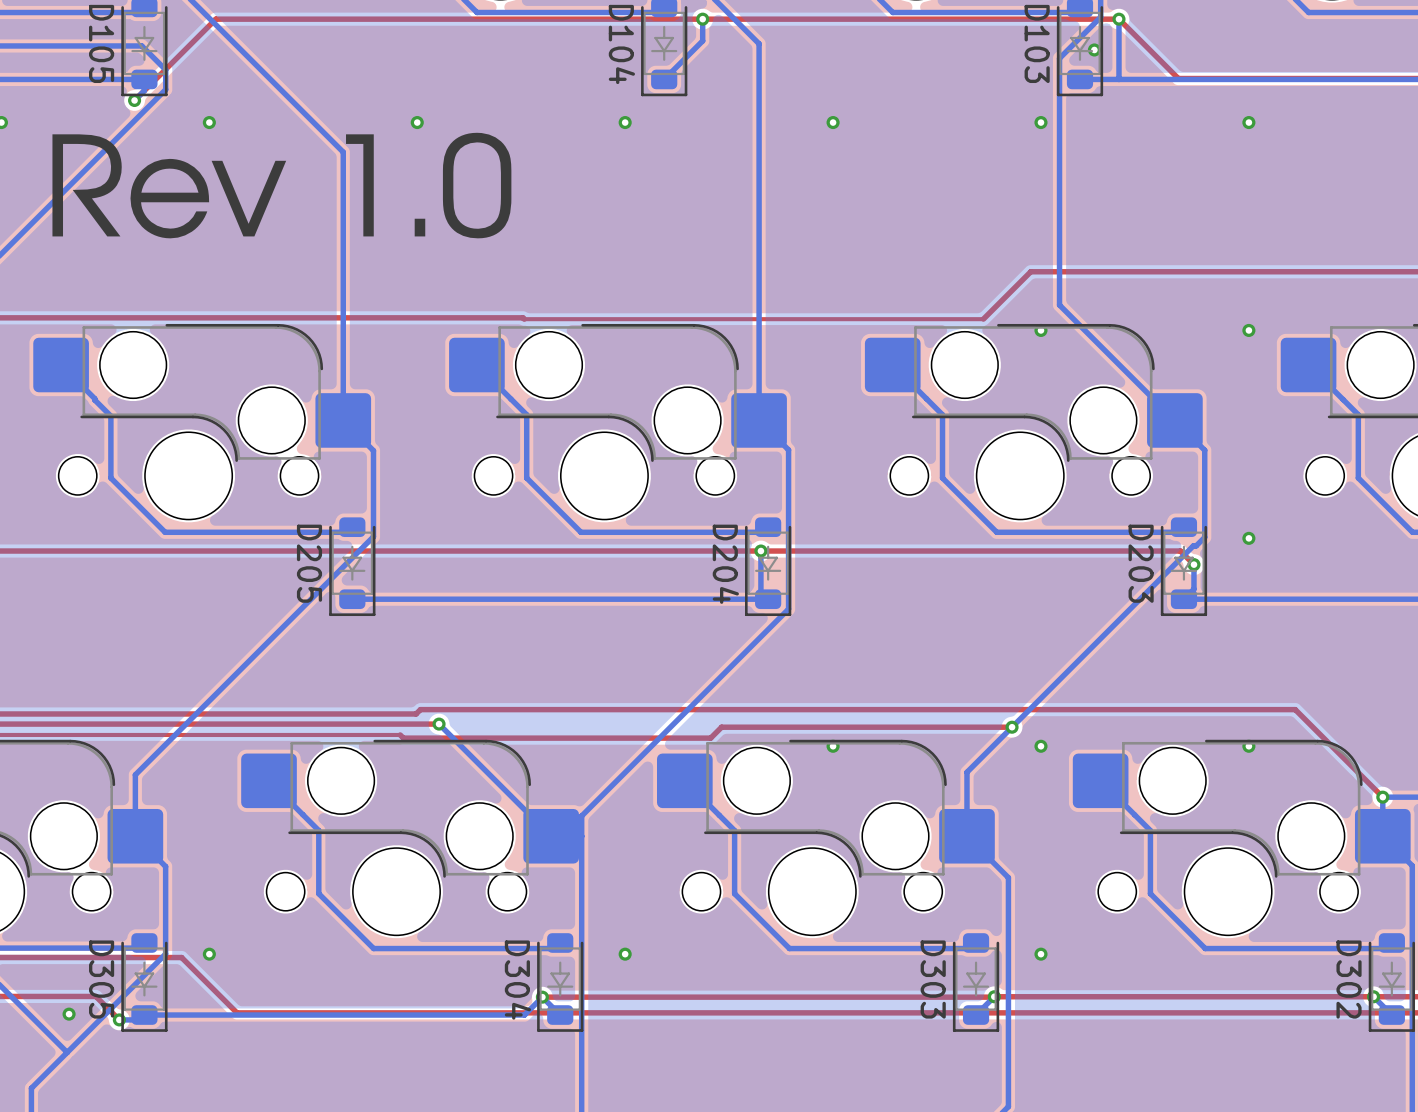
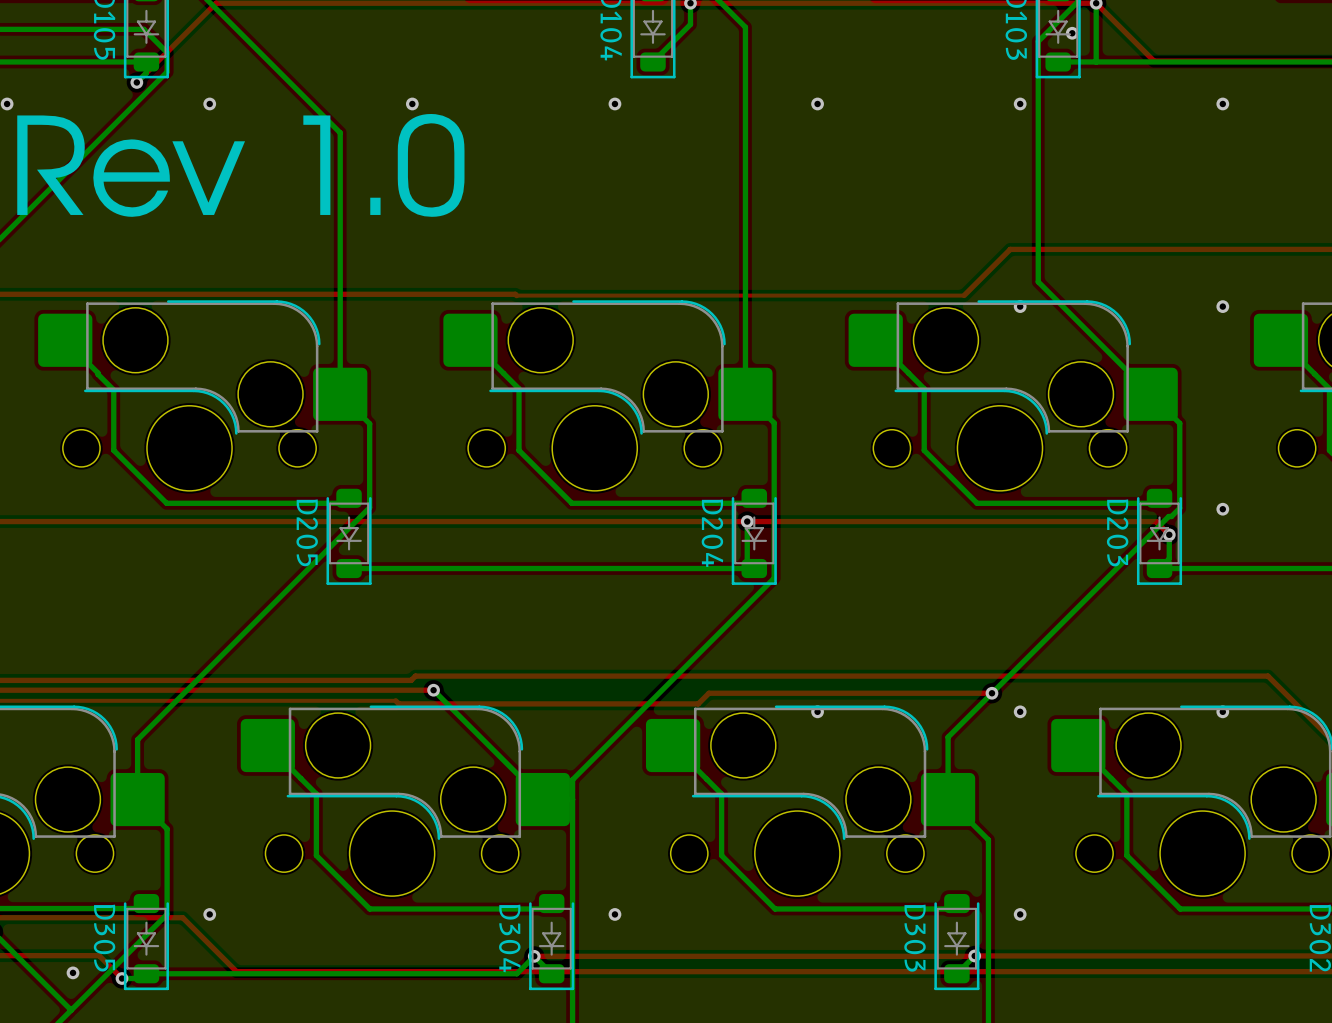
drawing position: (87, 185) -> (51, 165)
drawing position: (359, 185) -> (316, 165)
drawing position: (477, 185) -> (431, 165)
drawing position: (169, 198) -> (131, 178)
drawing position: (248, 198) -> (208, 178)
drawing position: (419, 227) -> (375, 206)

